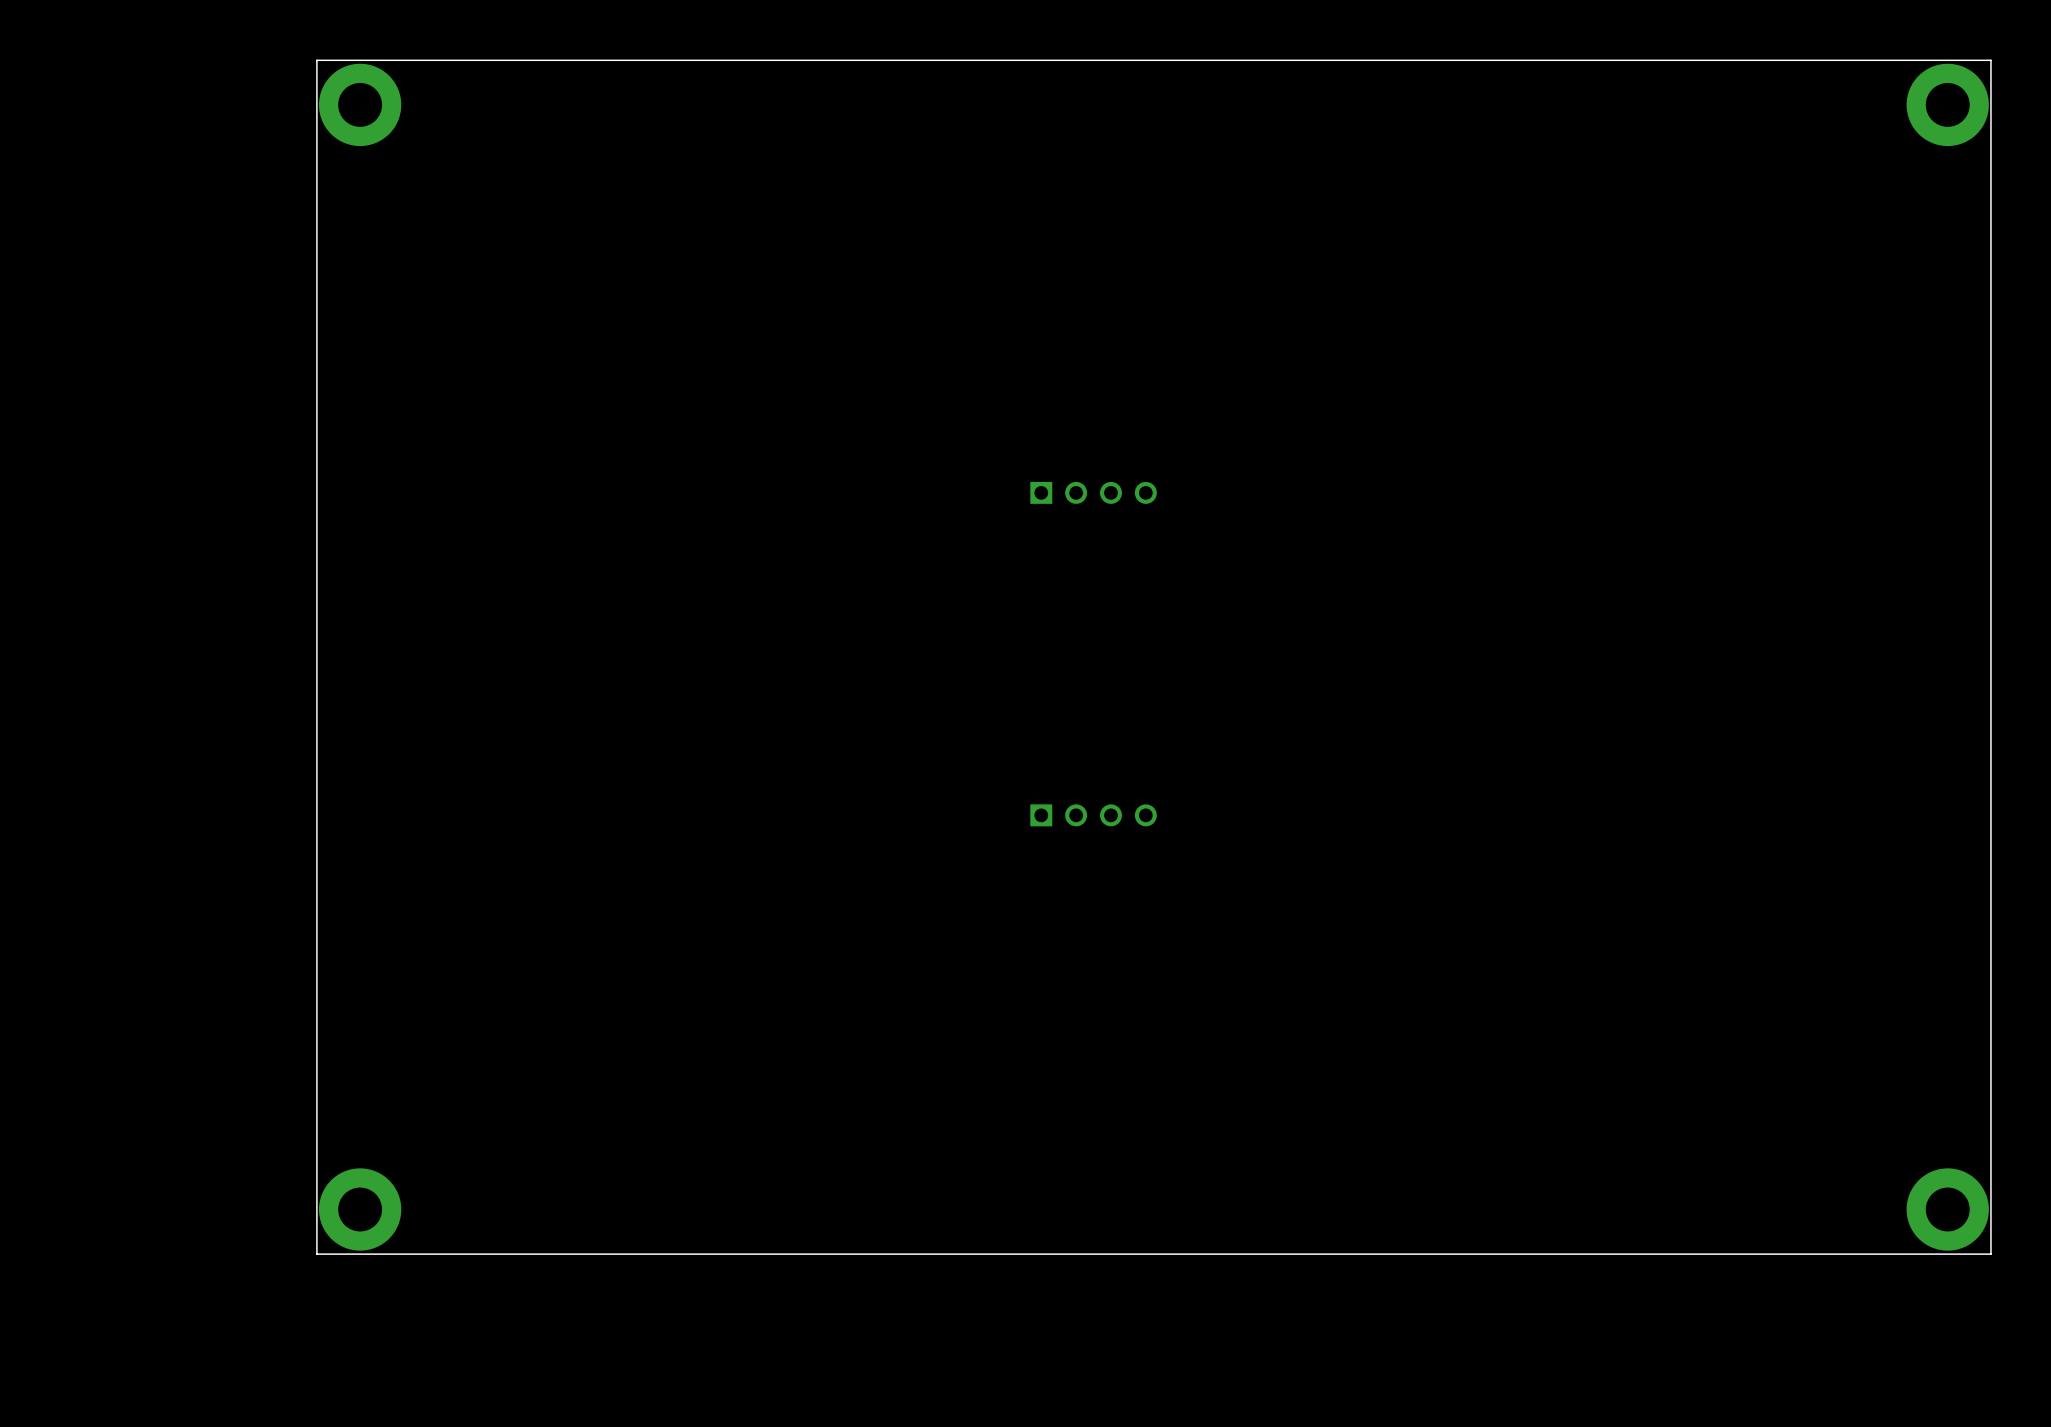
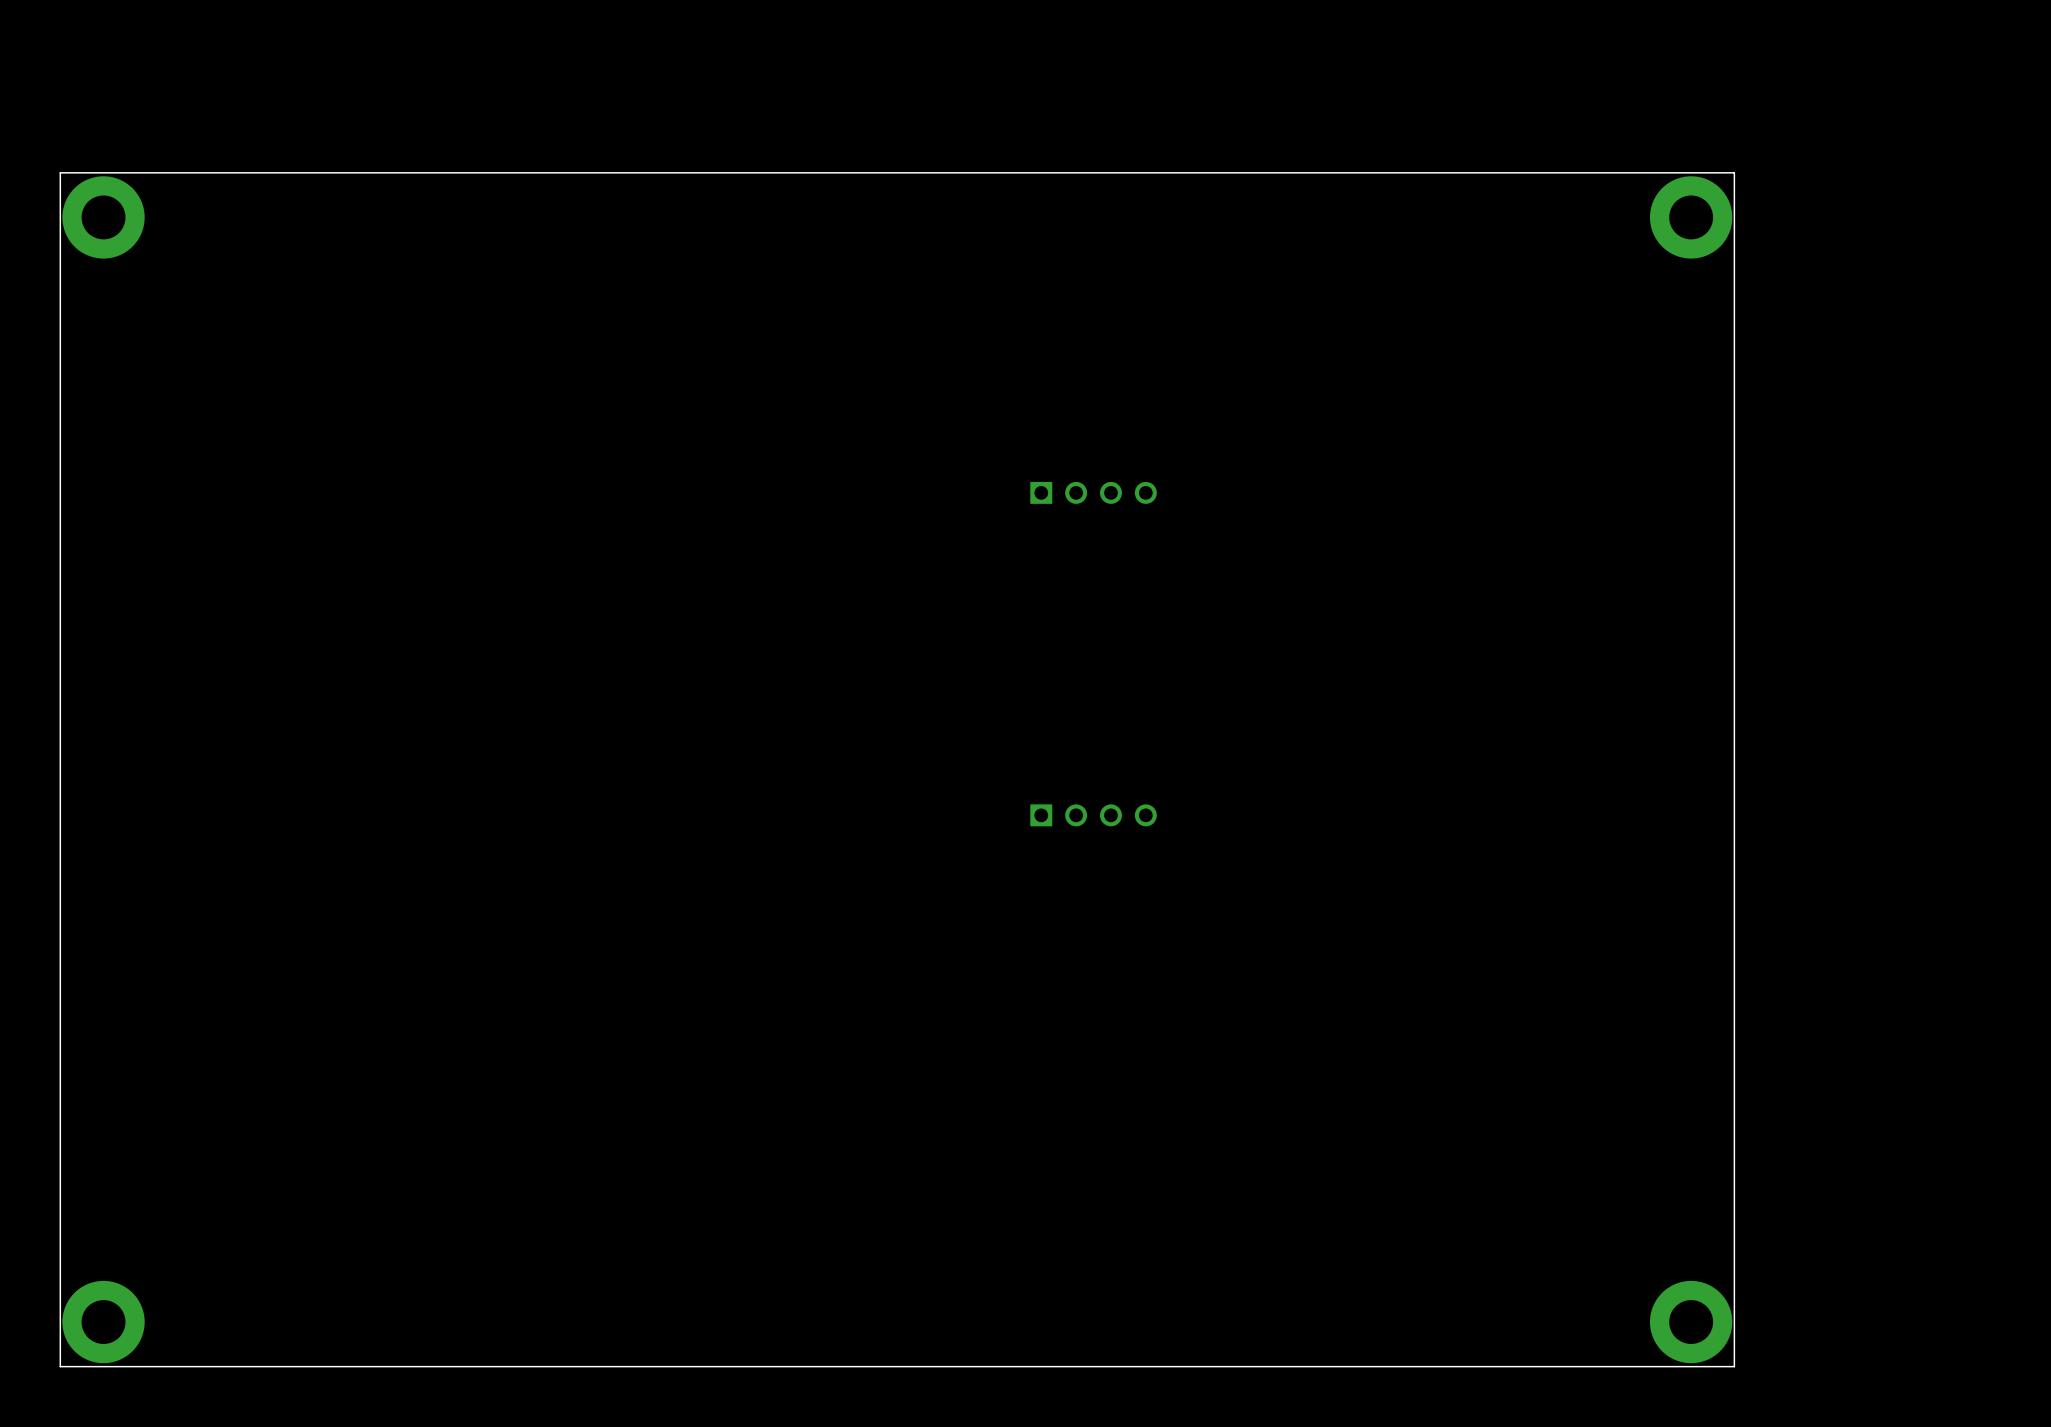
board edge: (1990, 60) (316, 60) (316, 1254) (1990, 1254) (1990, 60) -> (1734, 172) (60, 172) (60, 1366) (1734, 1366) (1734, 172)
part position: (360, 104) -> (103, 217)
part position: (1947, 104) -> (1691, 217)
part position: (360, 1209) -> (103, 1322)
part position: (1947, 1209) -> (1691, 1322)

